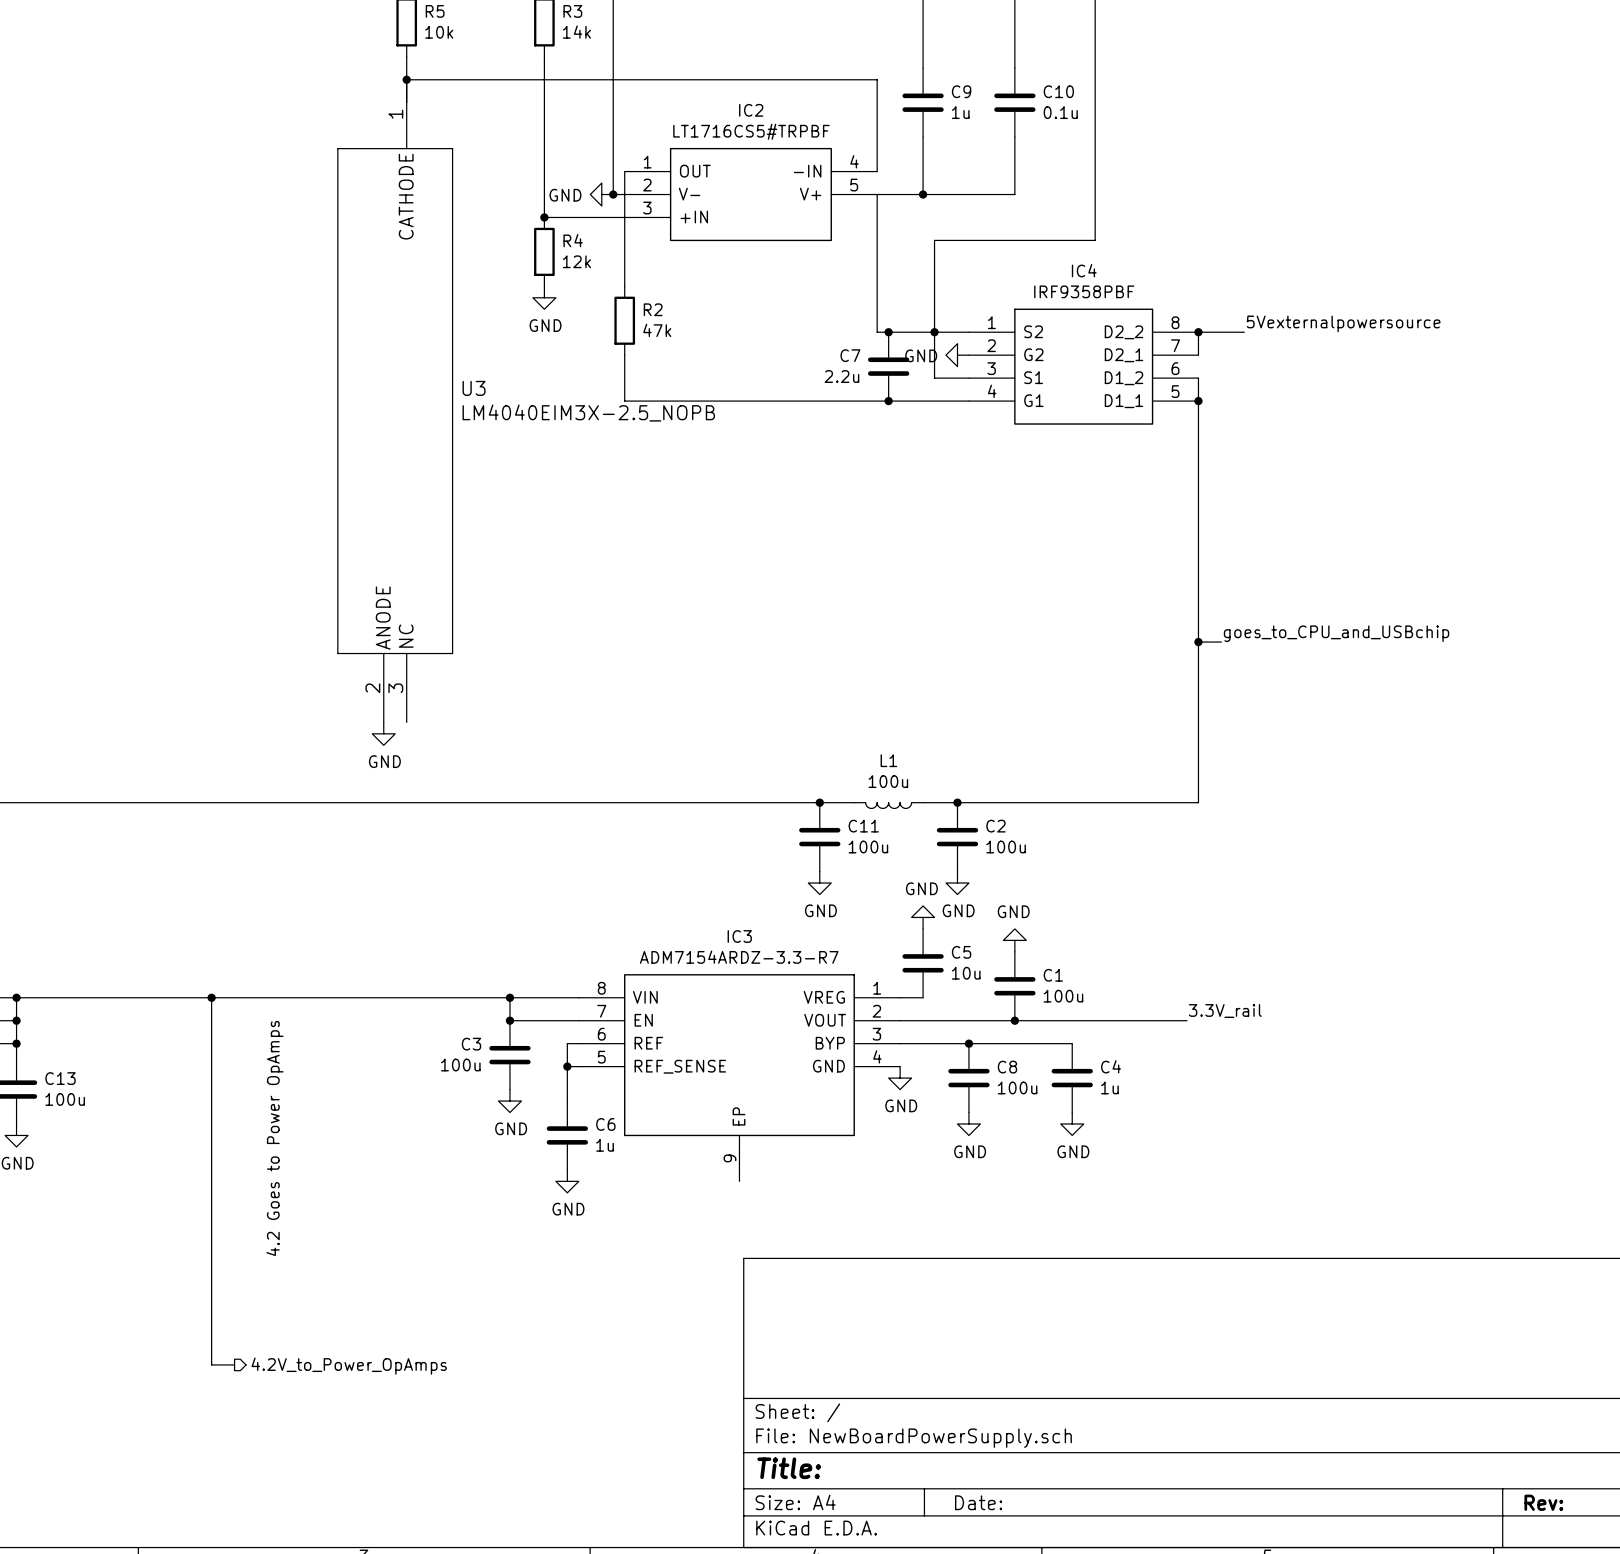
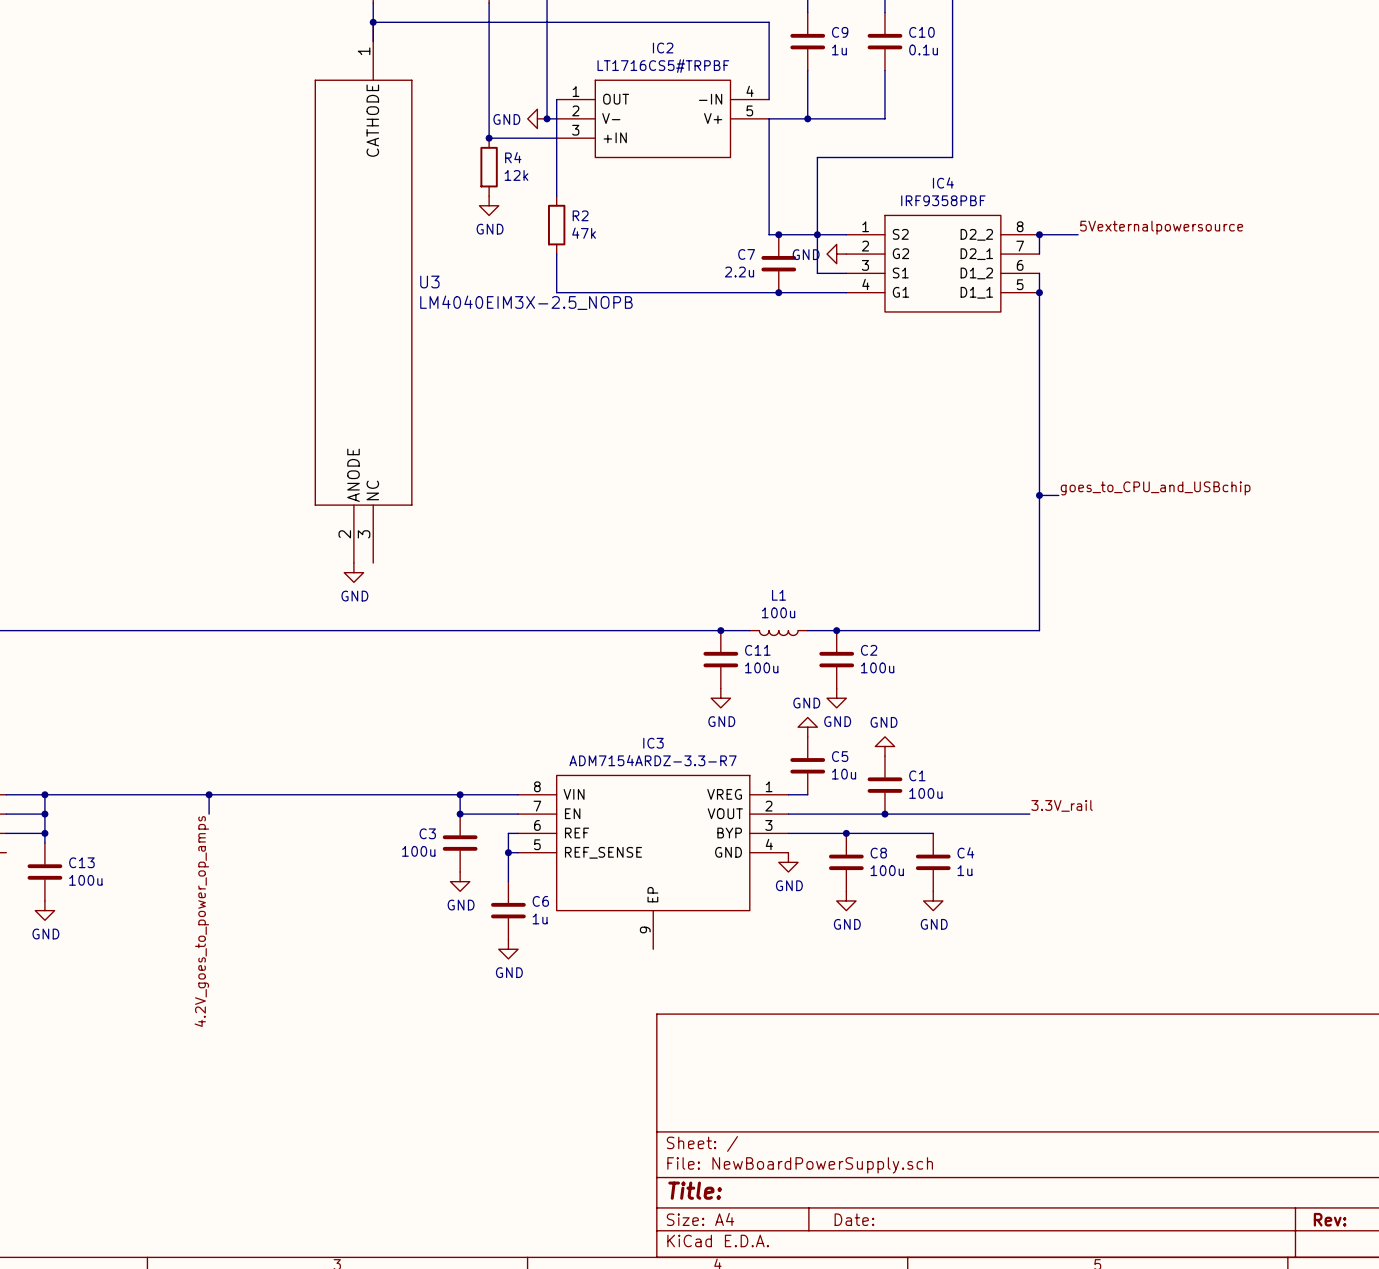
wire: (211, 1020) (211, 1364) (234, 1364) -> none
text: 4.2 Goes to Power OpAmps (274, 1138) -> none
label: none -> 4.2V_goes_to_power_op_amps (201, 921)
hierarchical label: 4.2V_to_Power_OpAmps (349, 1366) -> none

